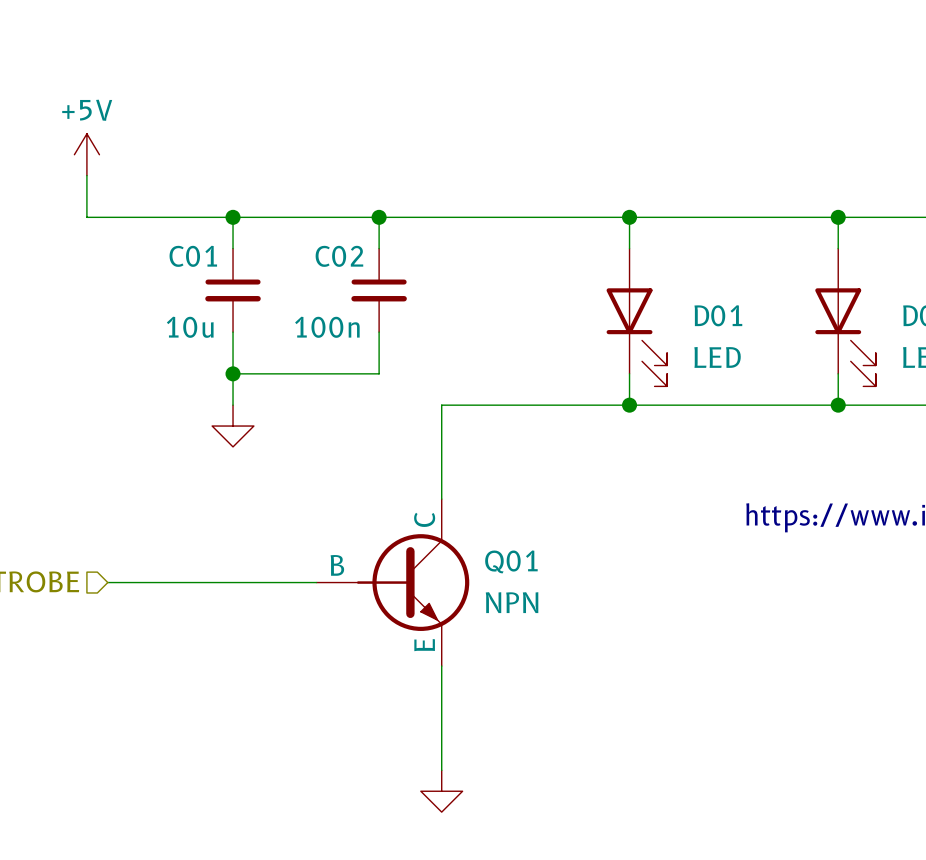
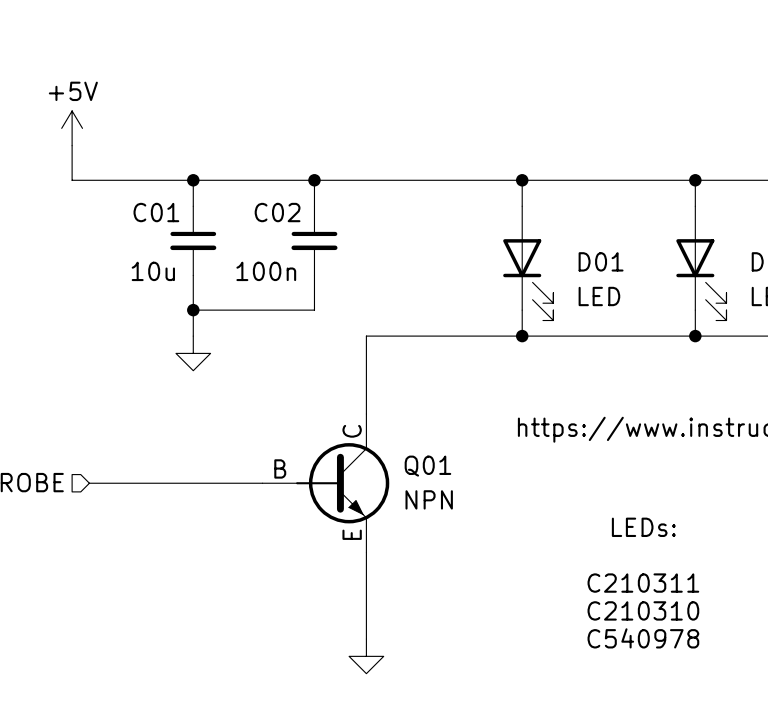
text: none -> LEDs: (643, 527)
text: none -> C210311 (643, 583)
text: none -> C210310 (643, 610)
text: none -> C540978 (643, 638)

